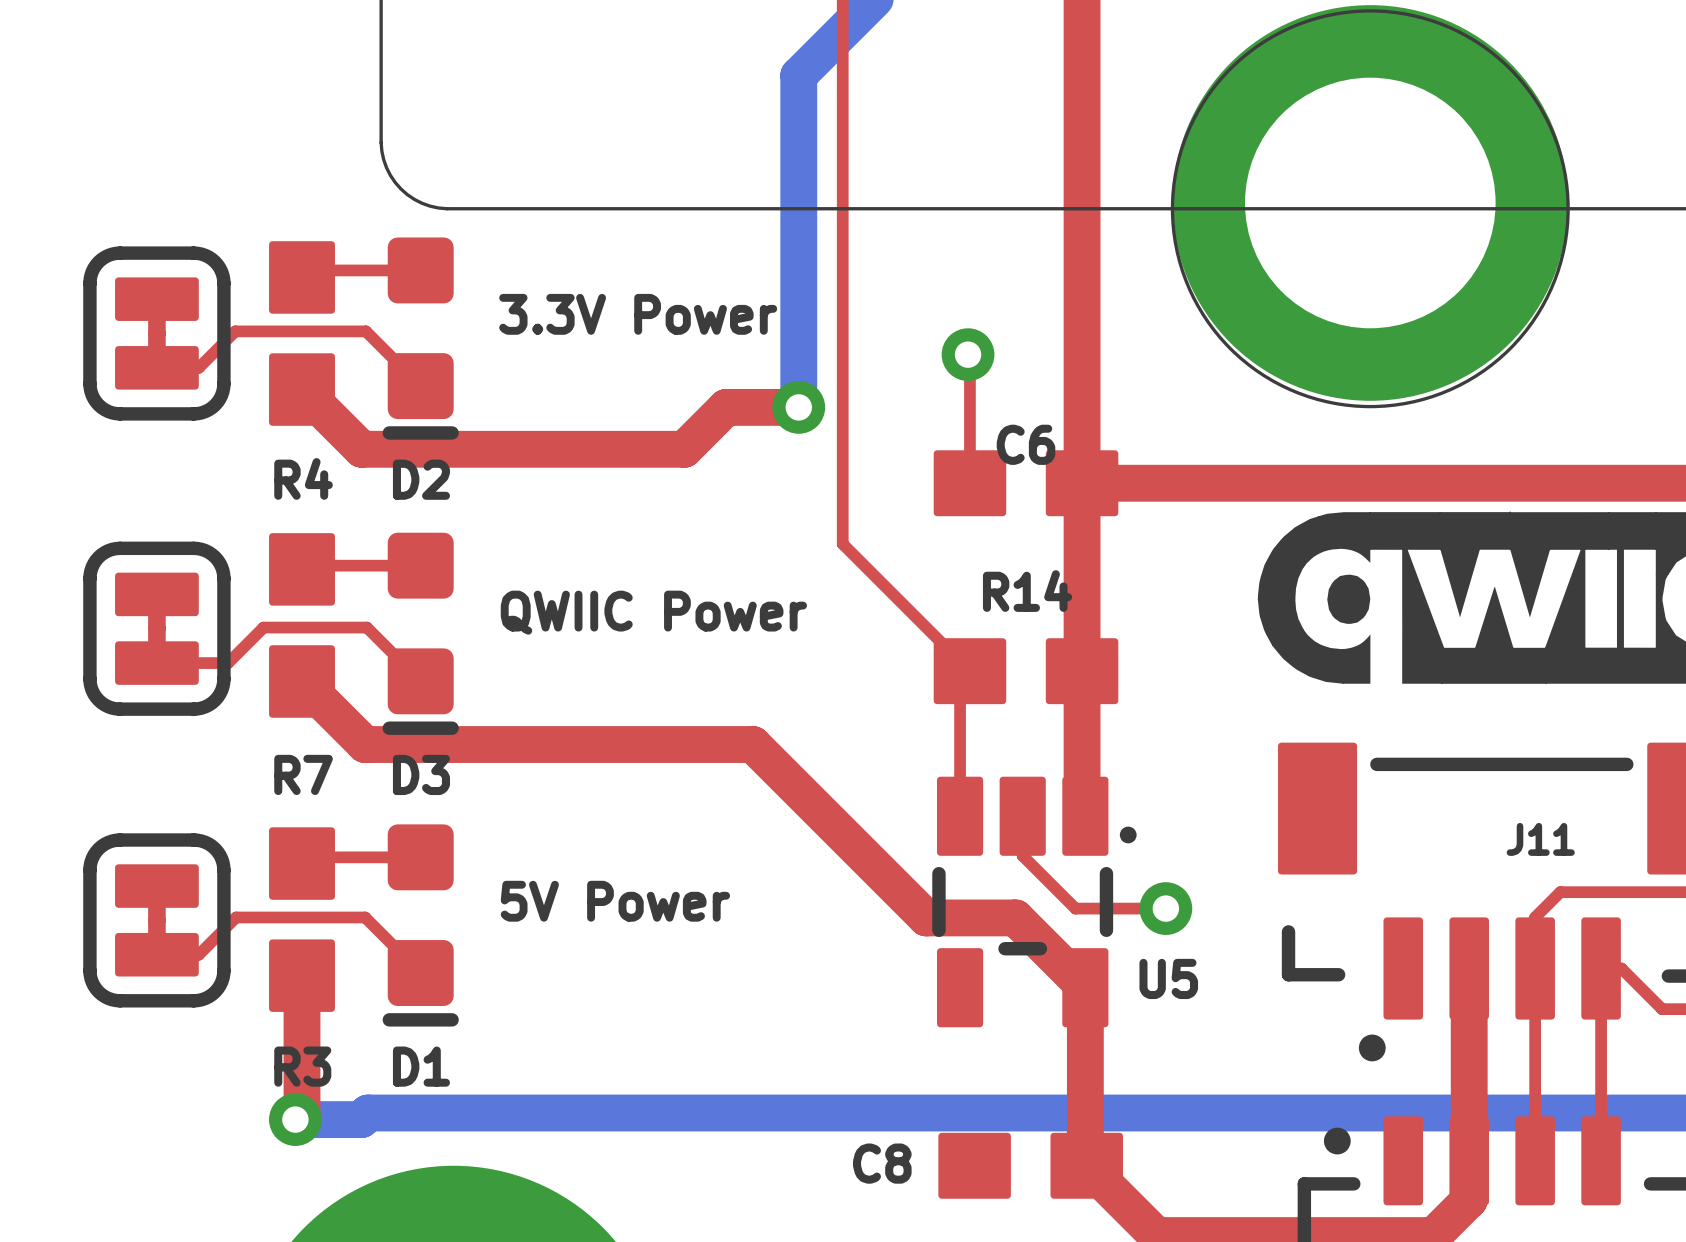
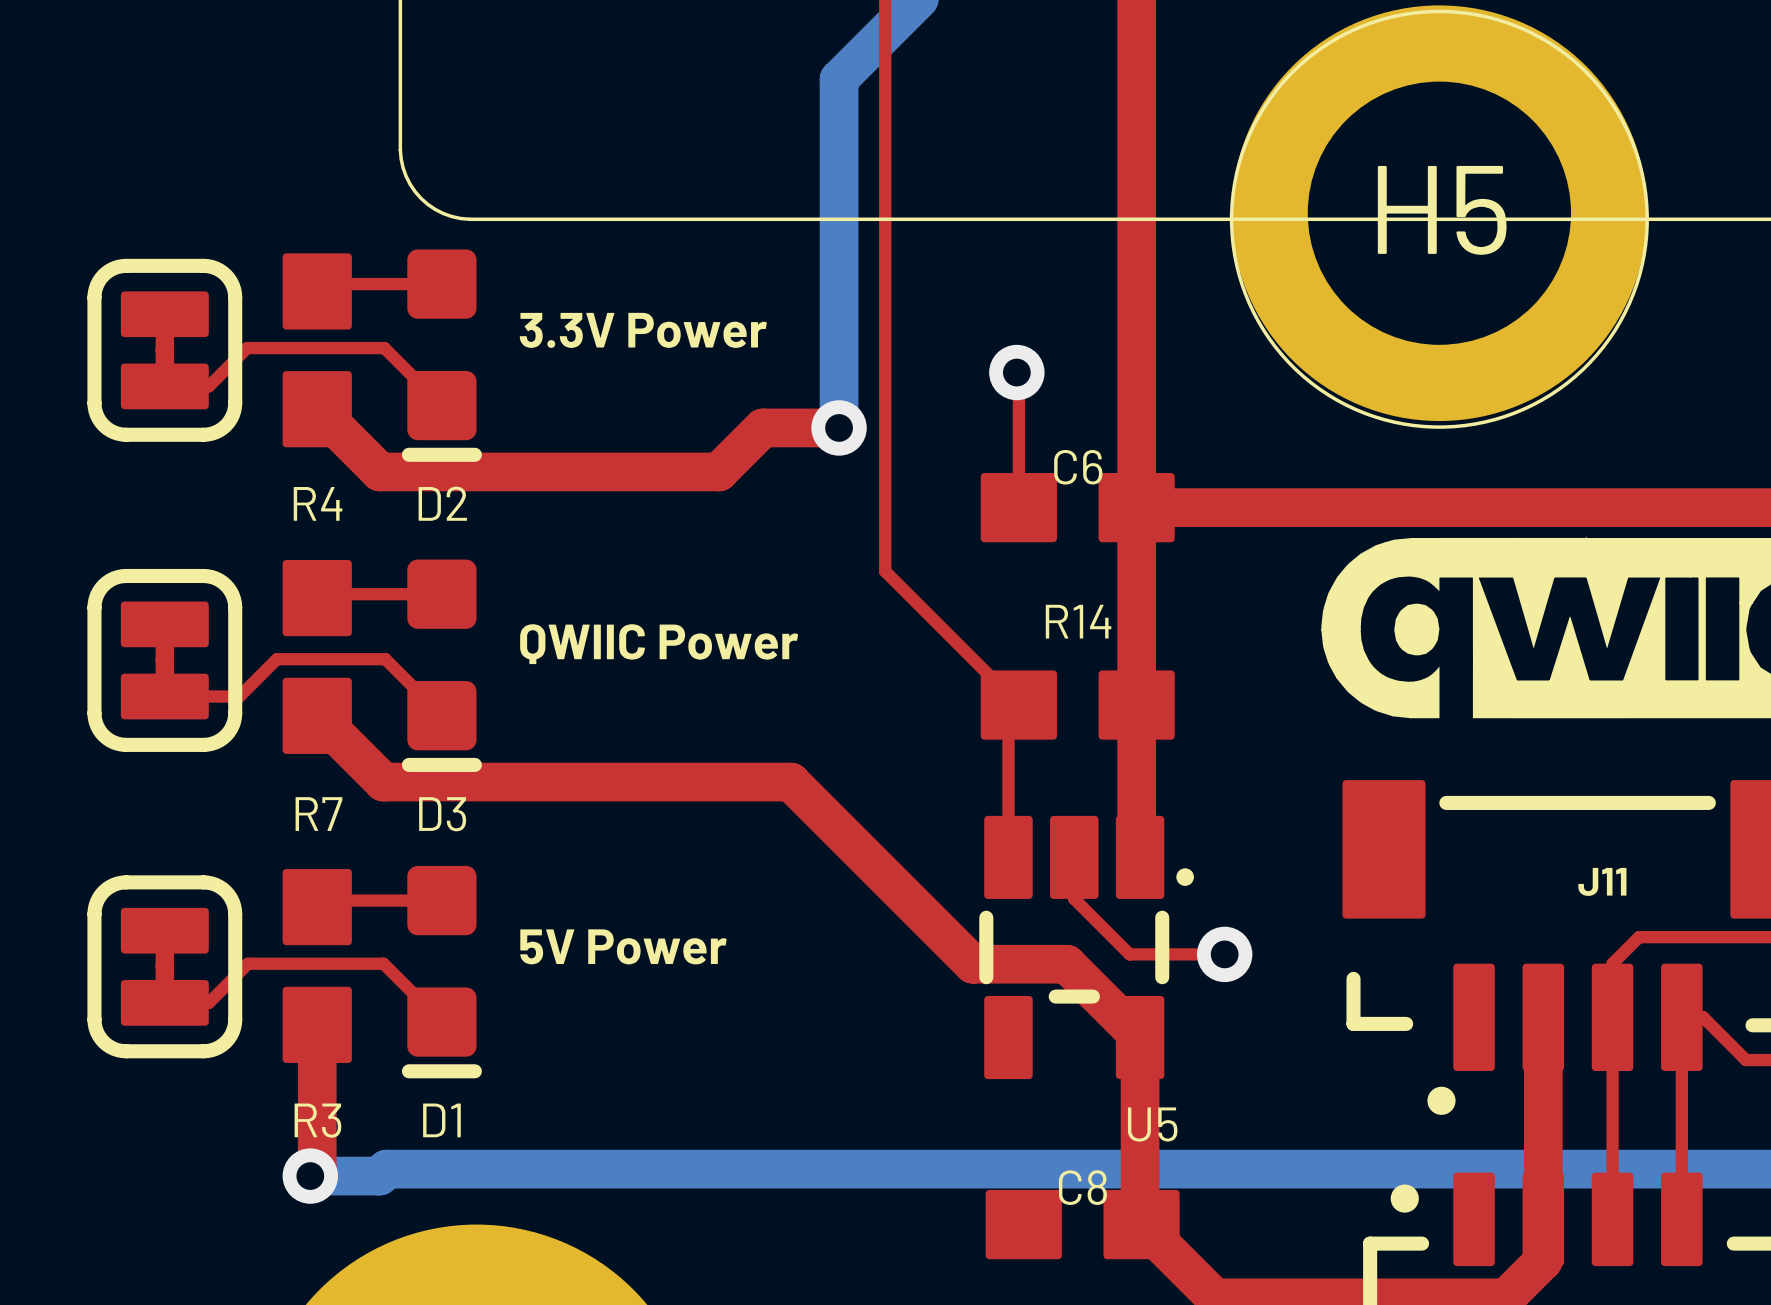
H5 name: none -> H5 (1442, 210)
U5 name position: U5 (1168, 978) -> U5 (1152, 1124)
C8 name position: C8 (882, 1163) -> C8 (1082, 1187)

